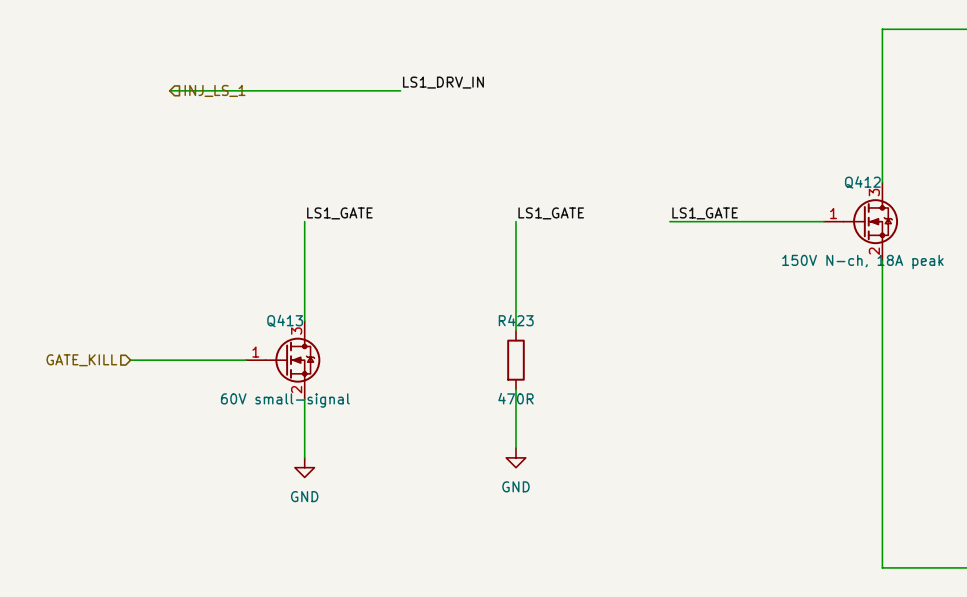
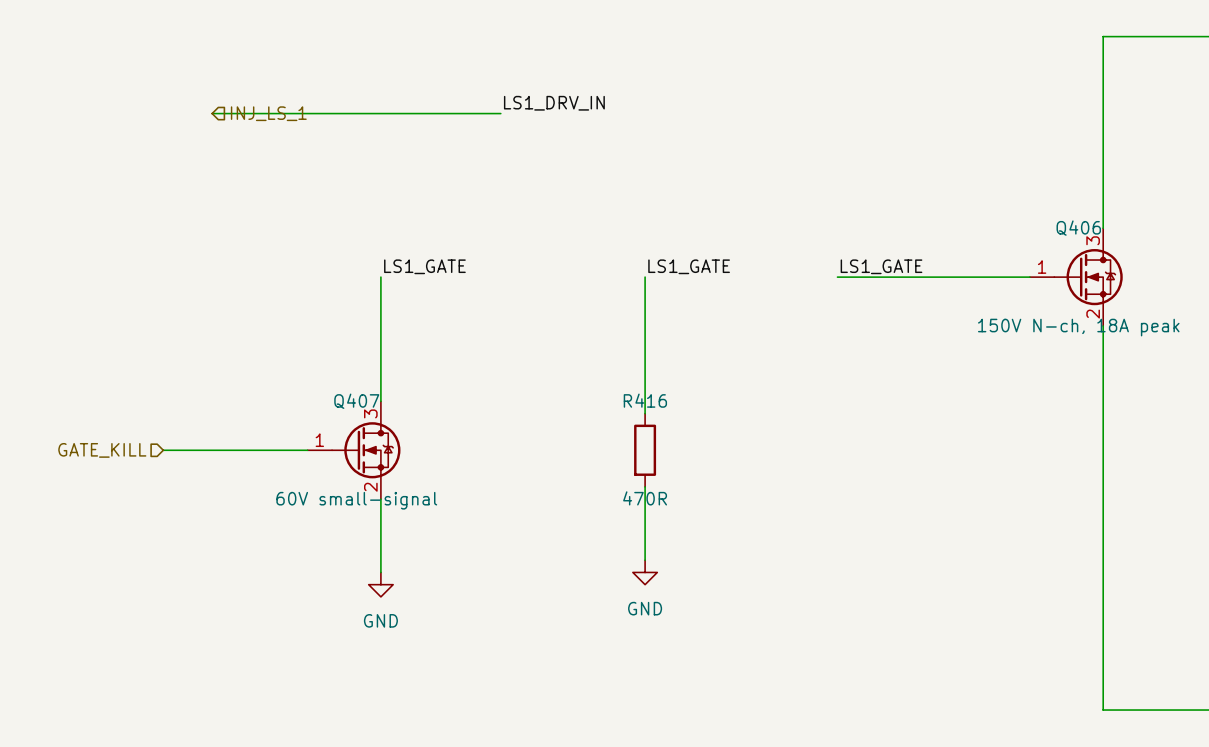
Q412 name: Q412 (862, 182) -> Q406 (1078, 228)
Q413 name: Q413 (285, 320) -> Q407 (356, 401)
R423 name: R423 (516, 320) -> R416 (645, 400)

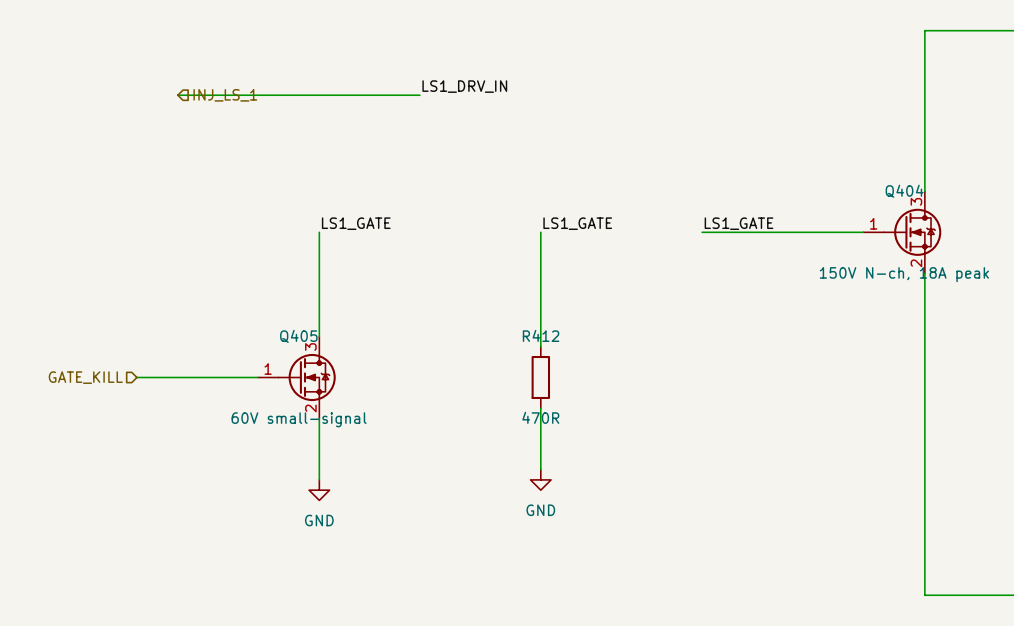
Q406 name: Q406 (1078, 228) -> Q404 (904, 191)
R416 name: R416 (645, 400) -> R412 (541, 335)
Q407 name: Q407 (356, 401) -> Q405 (298, 336)

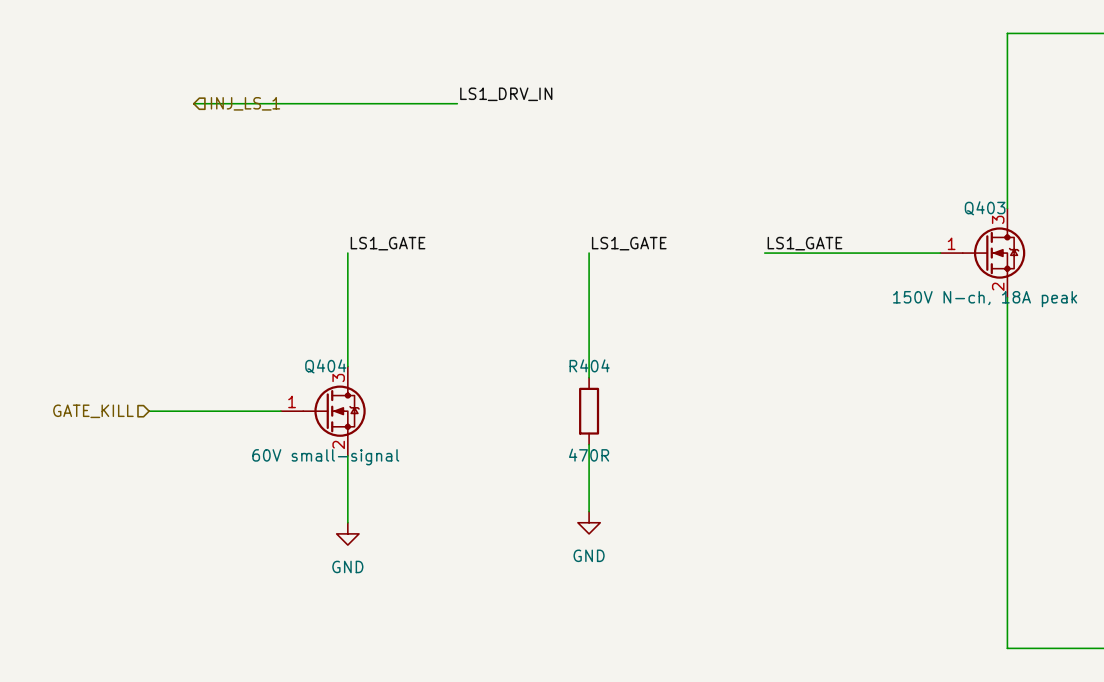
Q404 name: Q404 (904, 191) -> Q403 (985, 208)
R412 name: R412 (541, 335) -> R404 (589, 365)
Q405 name: Q405 (298, 336) -> Q404 (325, 366)

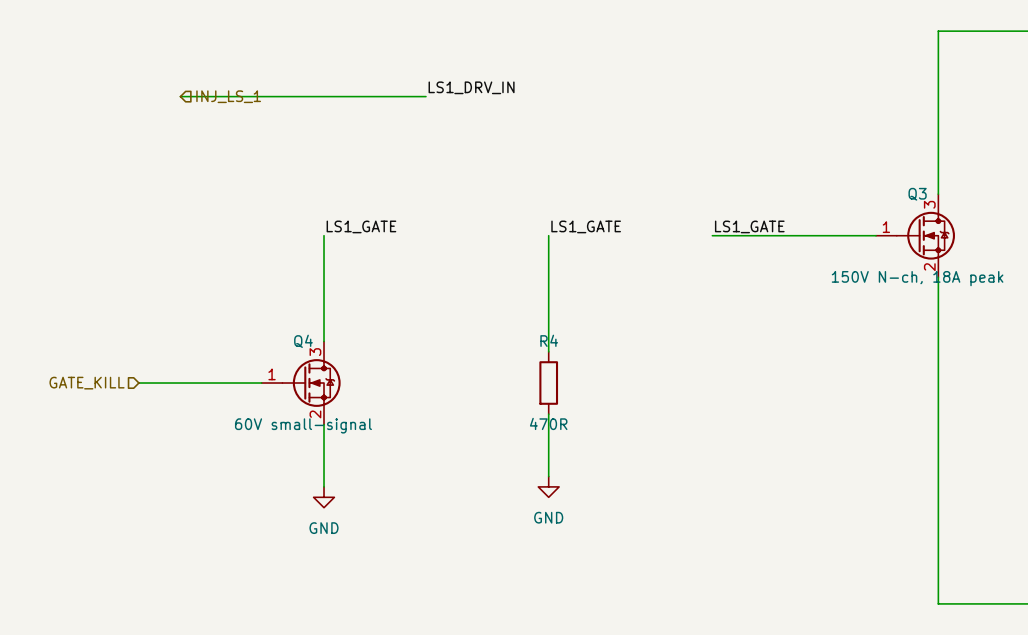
Q403 name: Q403 (985, 208) -> Q3 (917, 194)
R404 name: R404 (589, 365) -> R4 (549, 340)
Q404 name: Q404 (325, 366) -> Q4 (303, 341)

